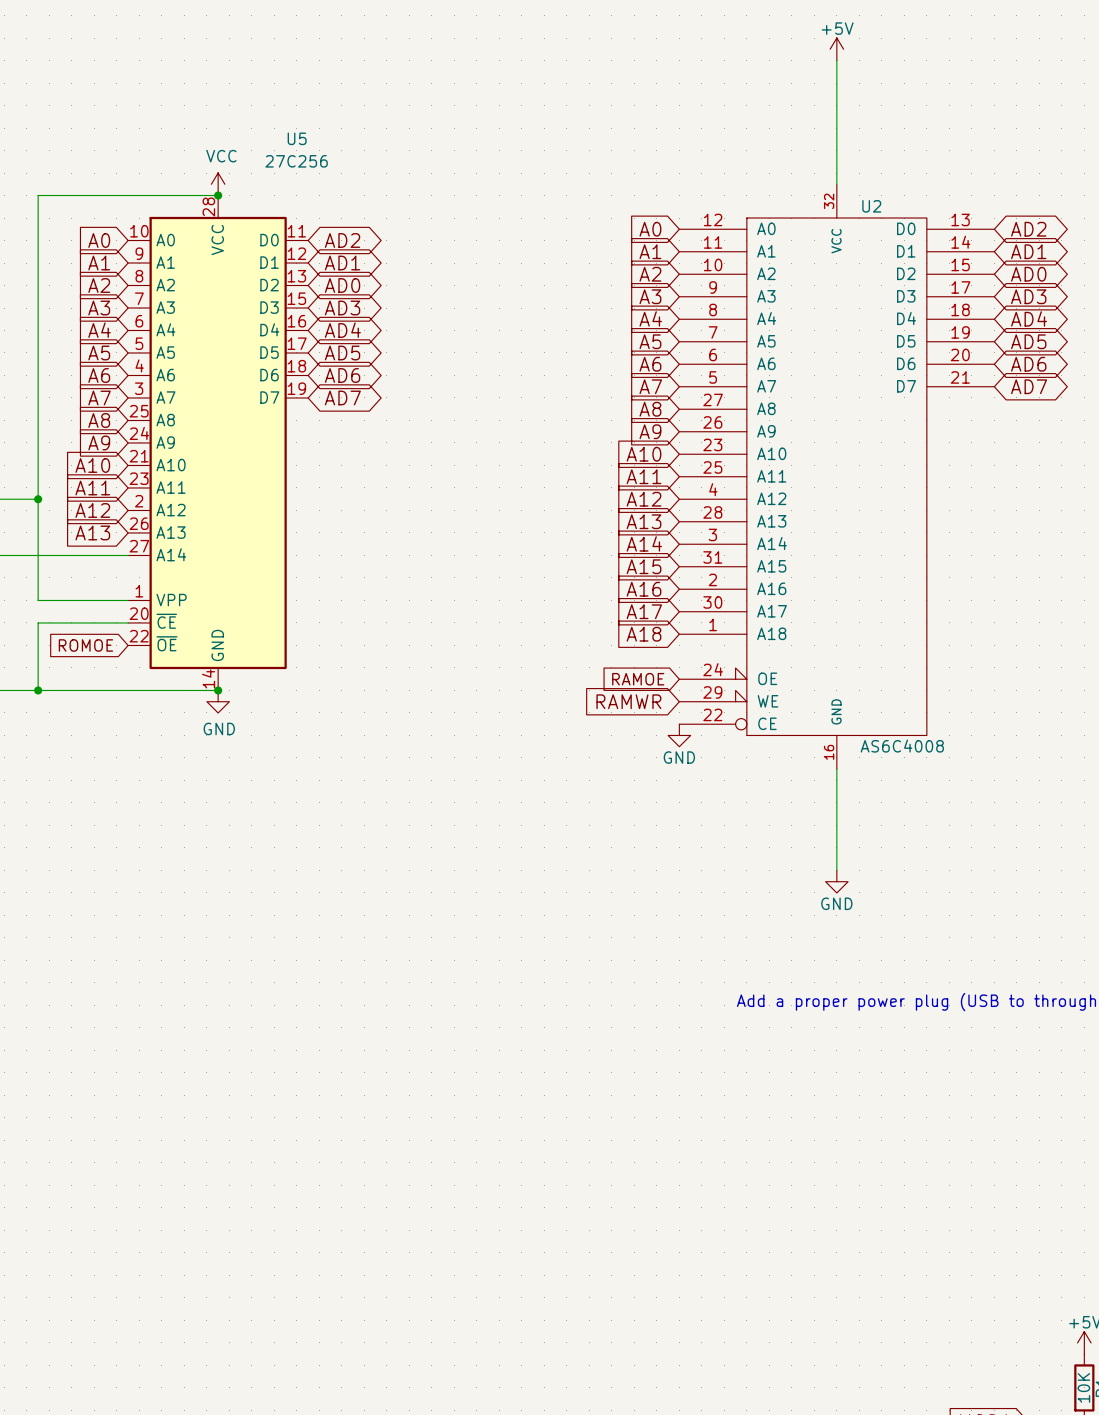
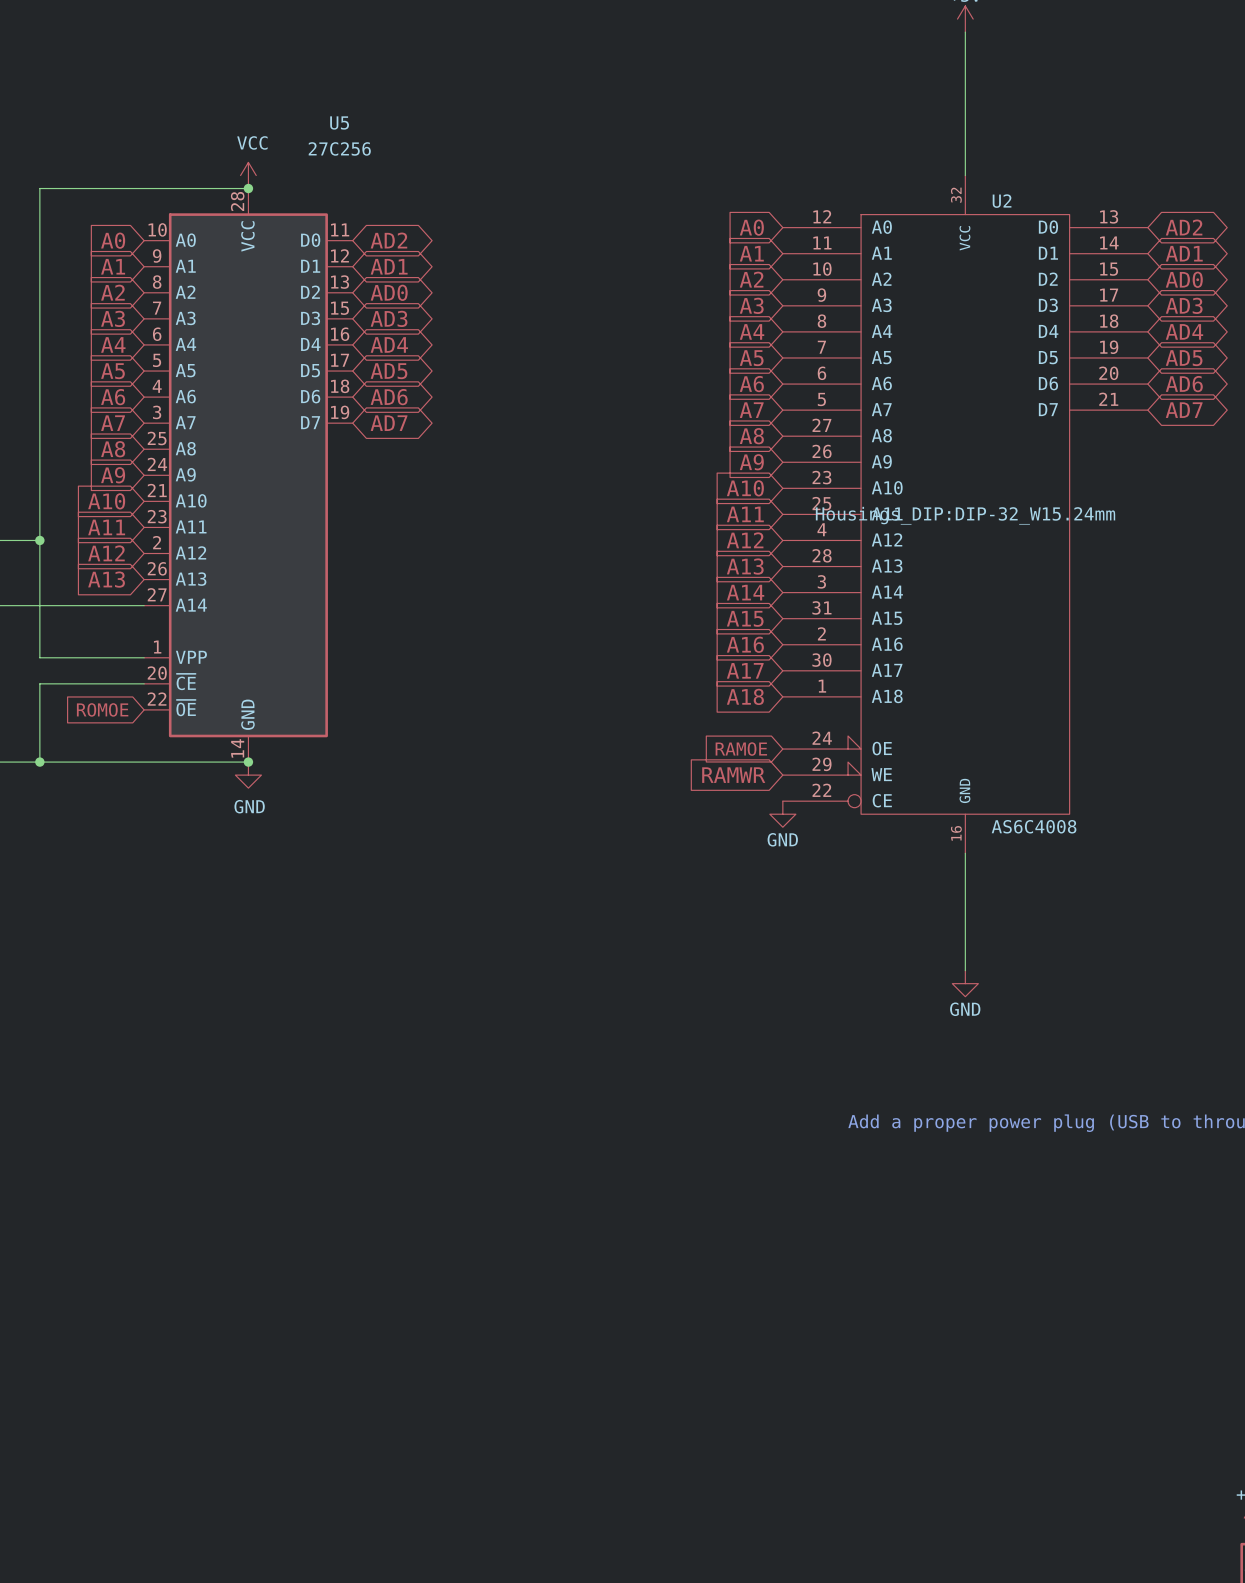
U2 text: none -> Housings_DIP:DIP-32_W15.24mm (965, 515)

